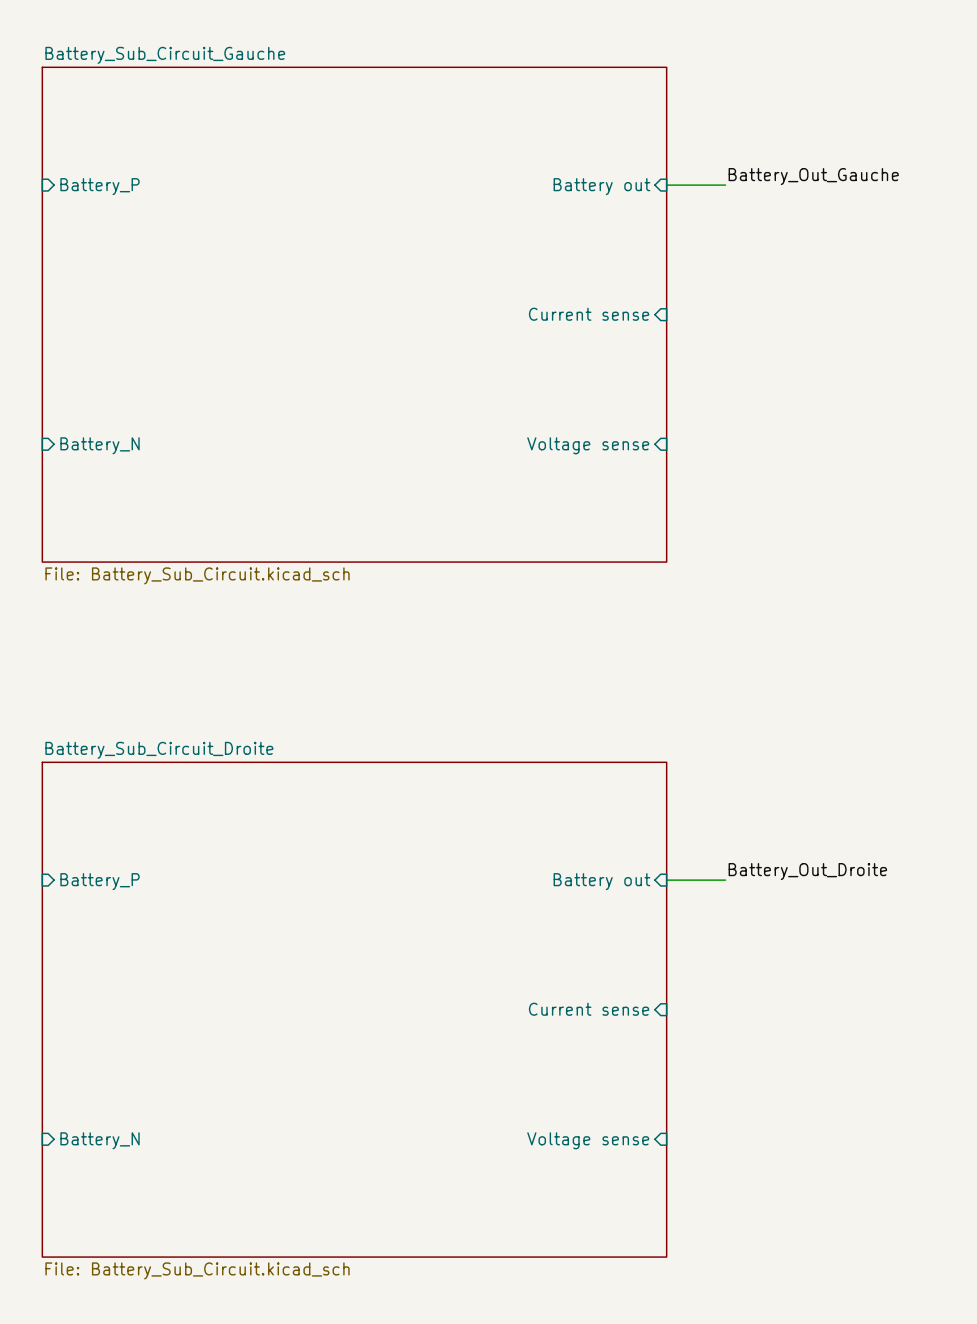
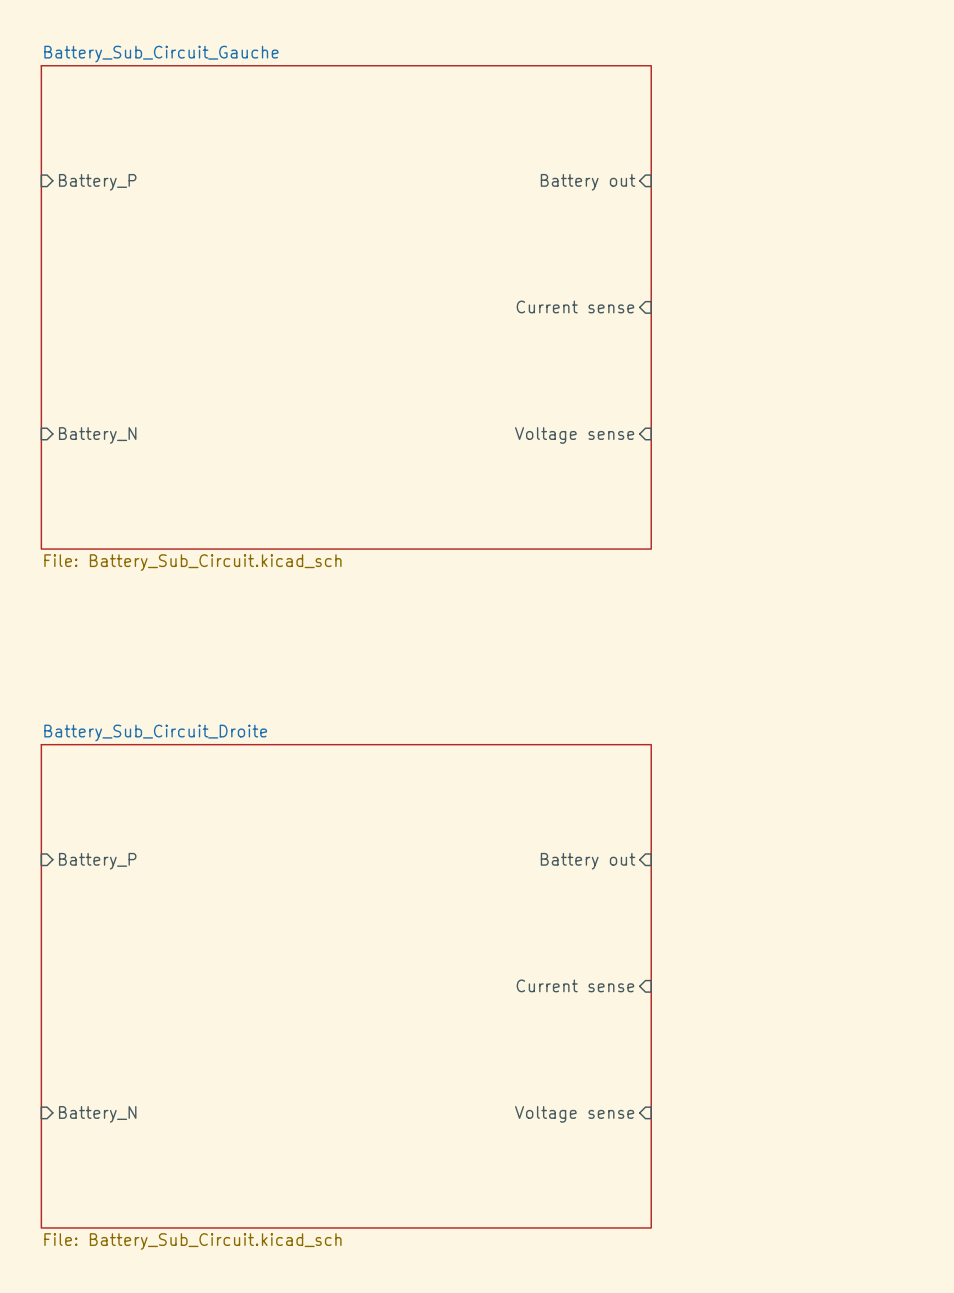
label: Battery_Out_Gauche (813, 176) -> none
wire: (666, 185) (725, 185) -> none
label: Battery_Out_Droite (807, 871) -> none
wire: (666, 880) (725, 880) -> none

